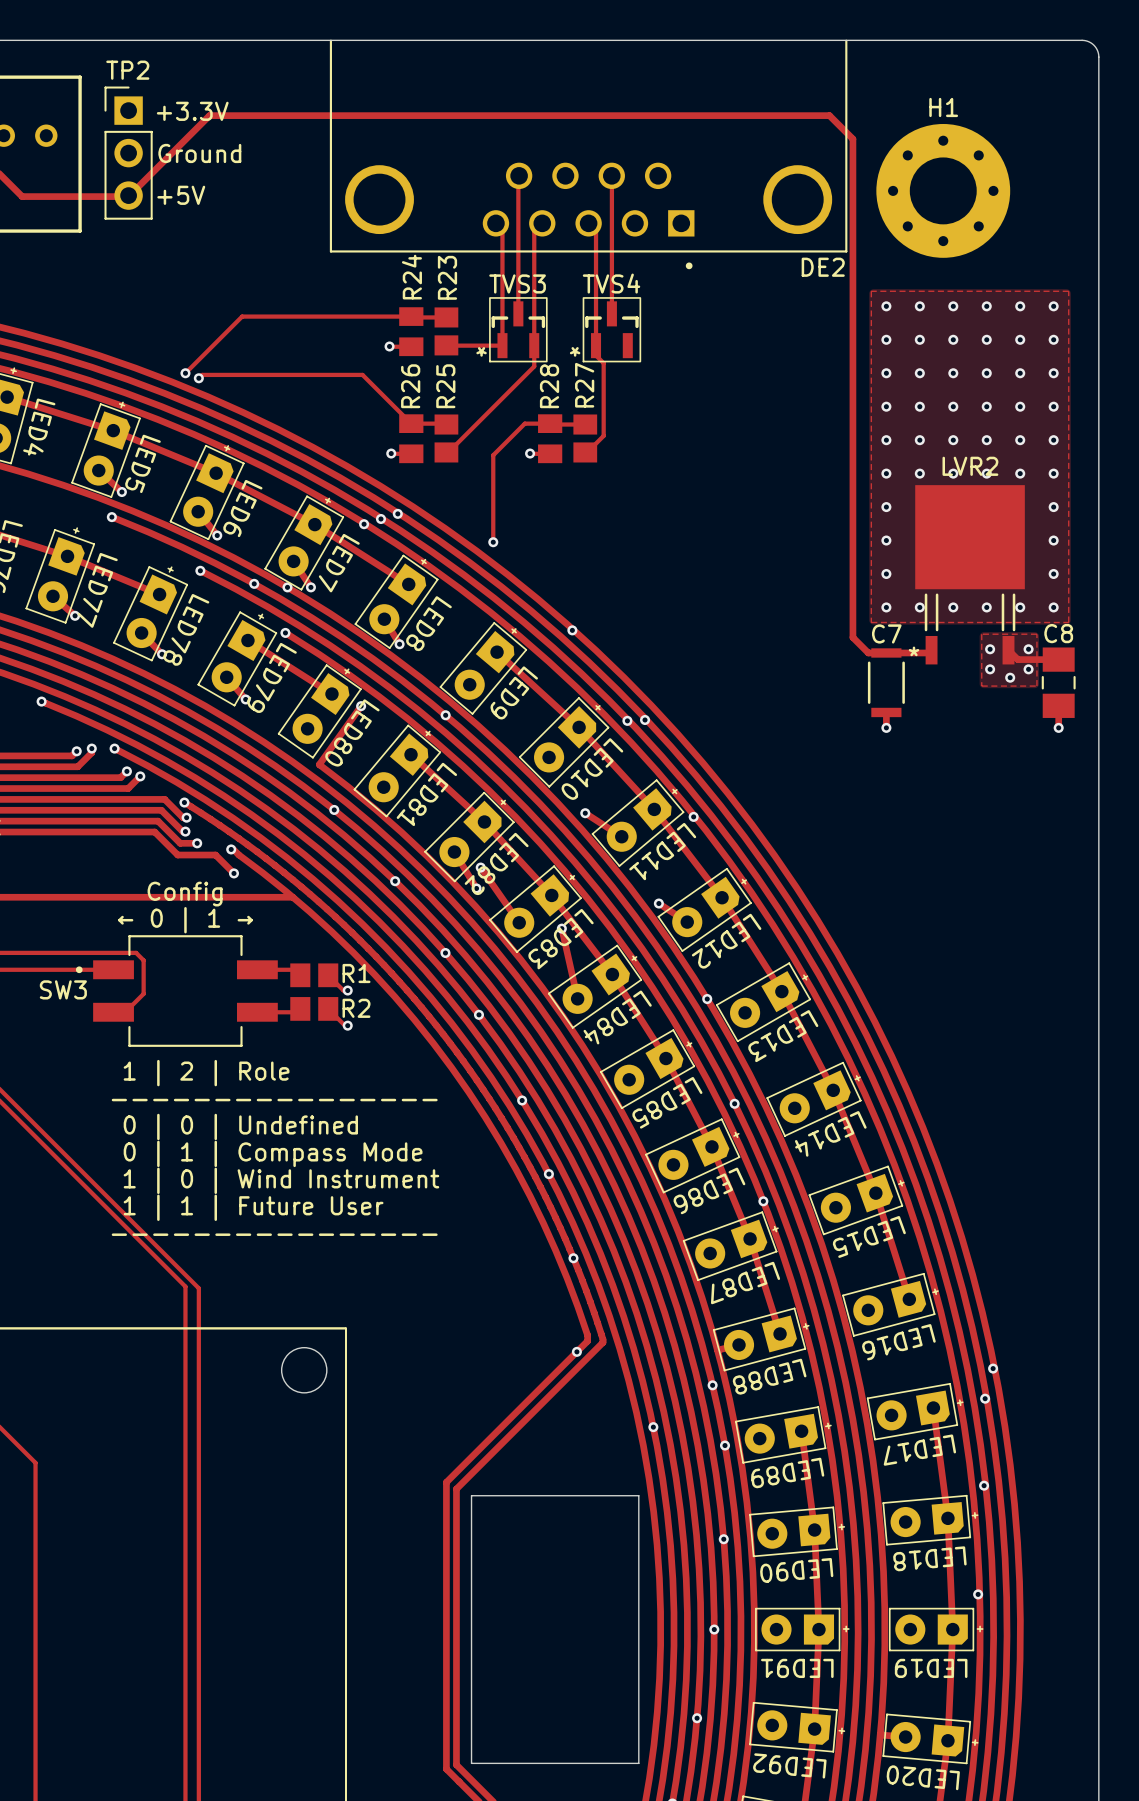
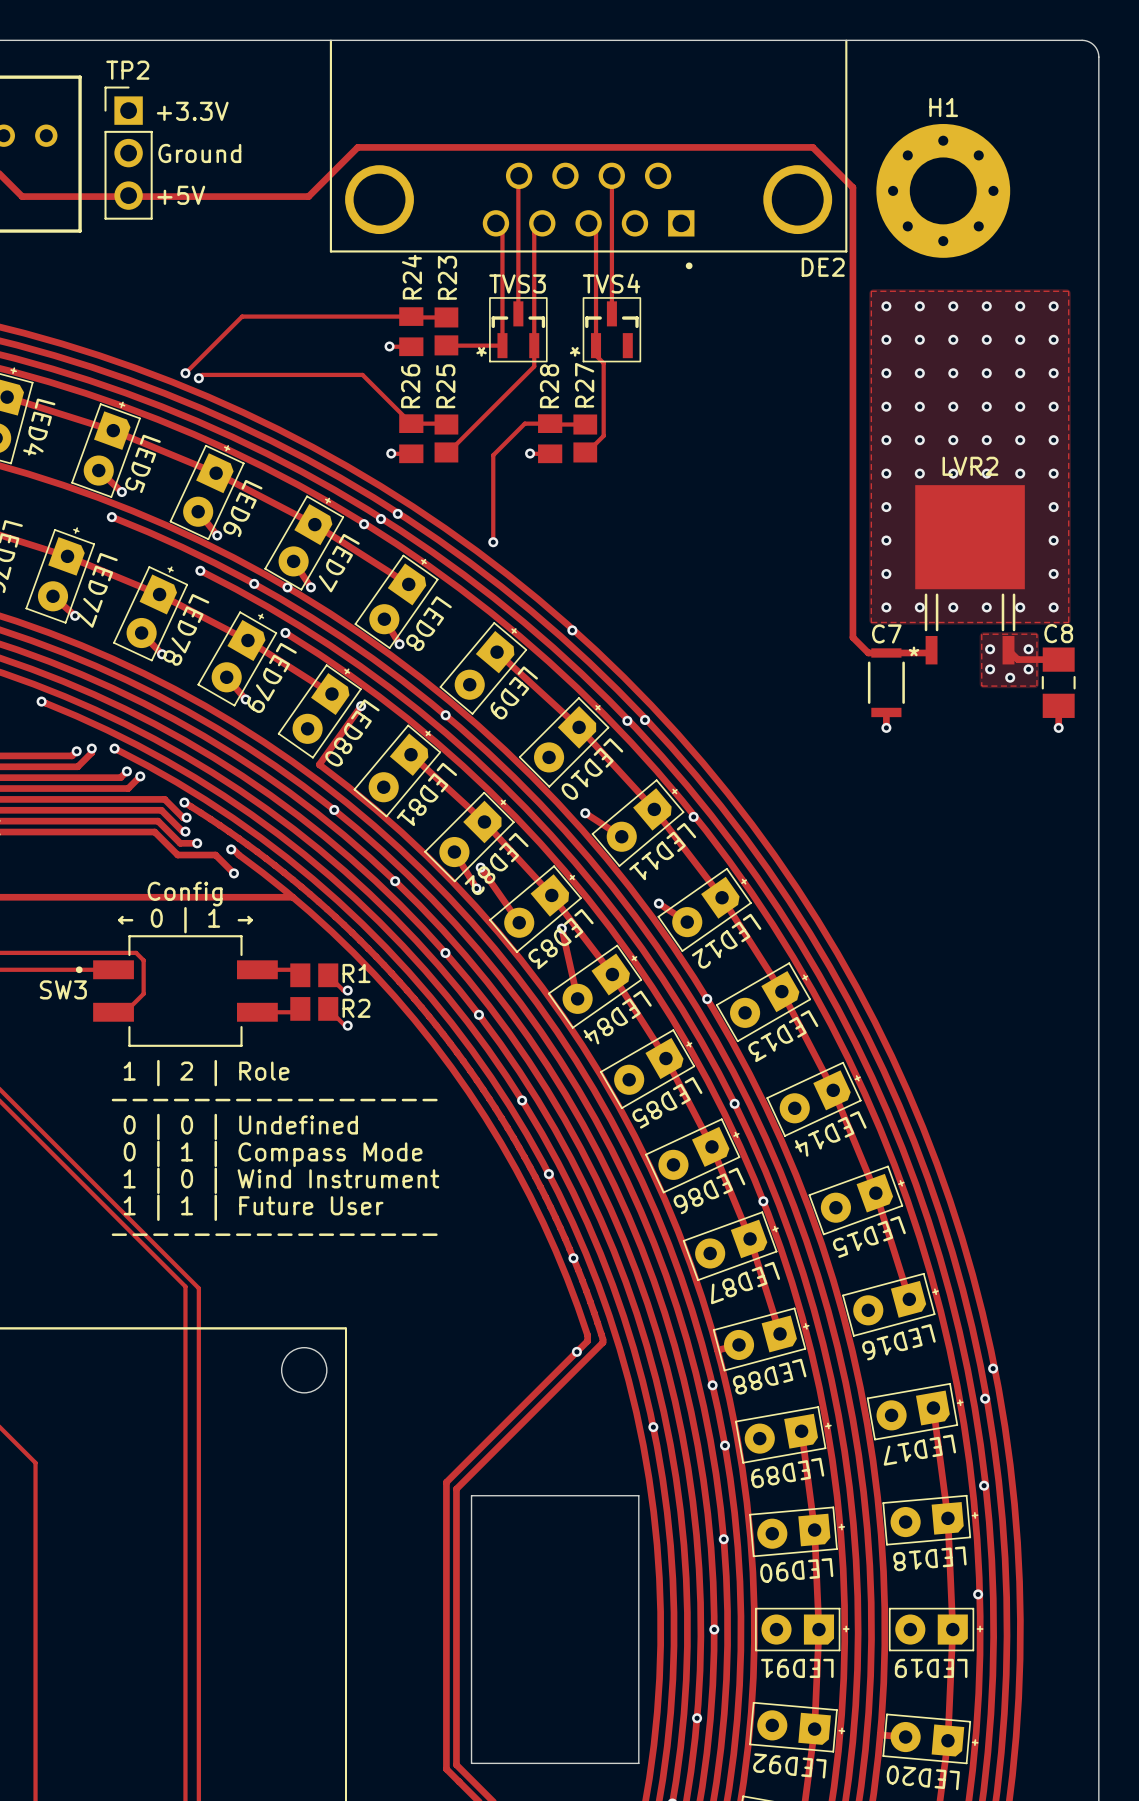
track: (852, 187) (852, 139) (829, 115) (209, 115) (128, 196) -> (852, 187) (812, 147) (357, 147) (308, 196) (128, 196)
track: none -> (159, 594) (247, 640)

